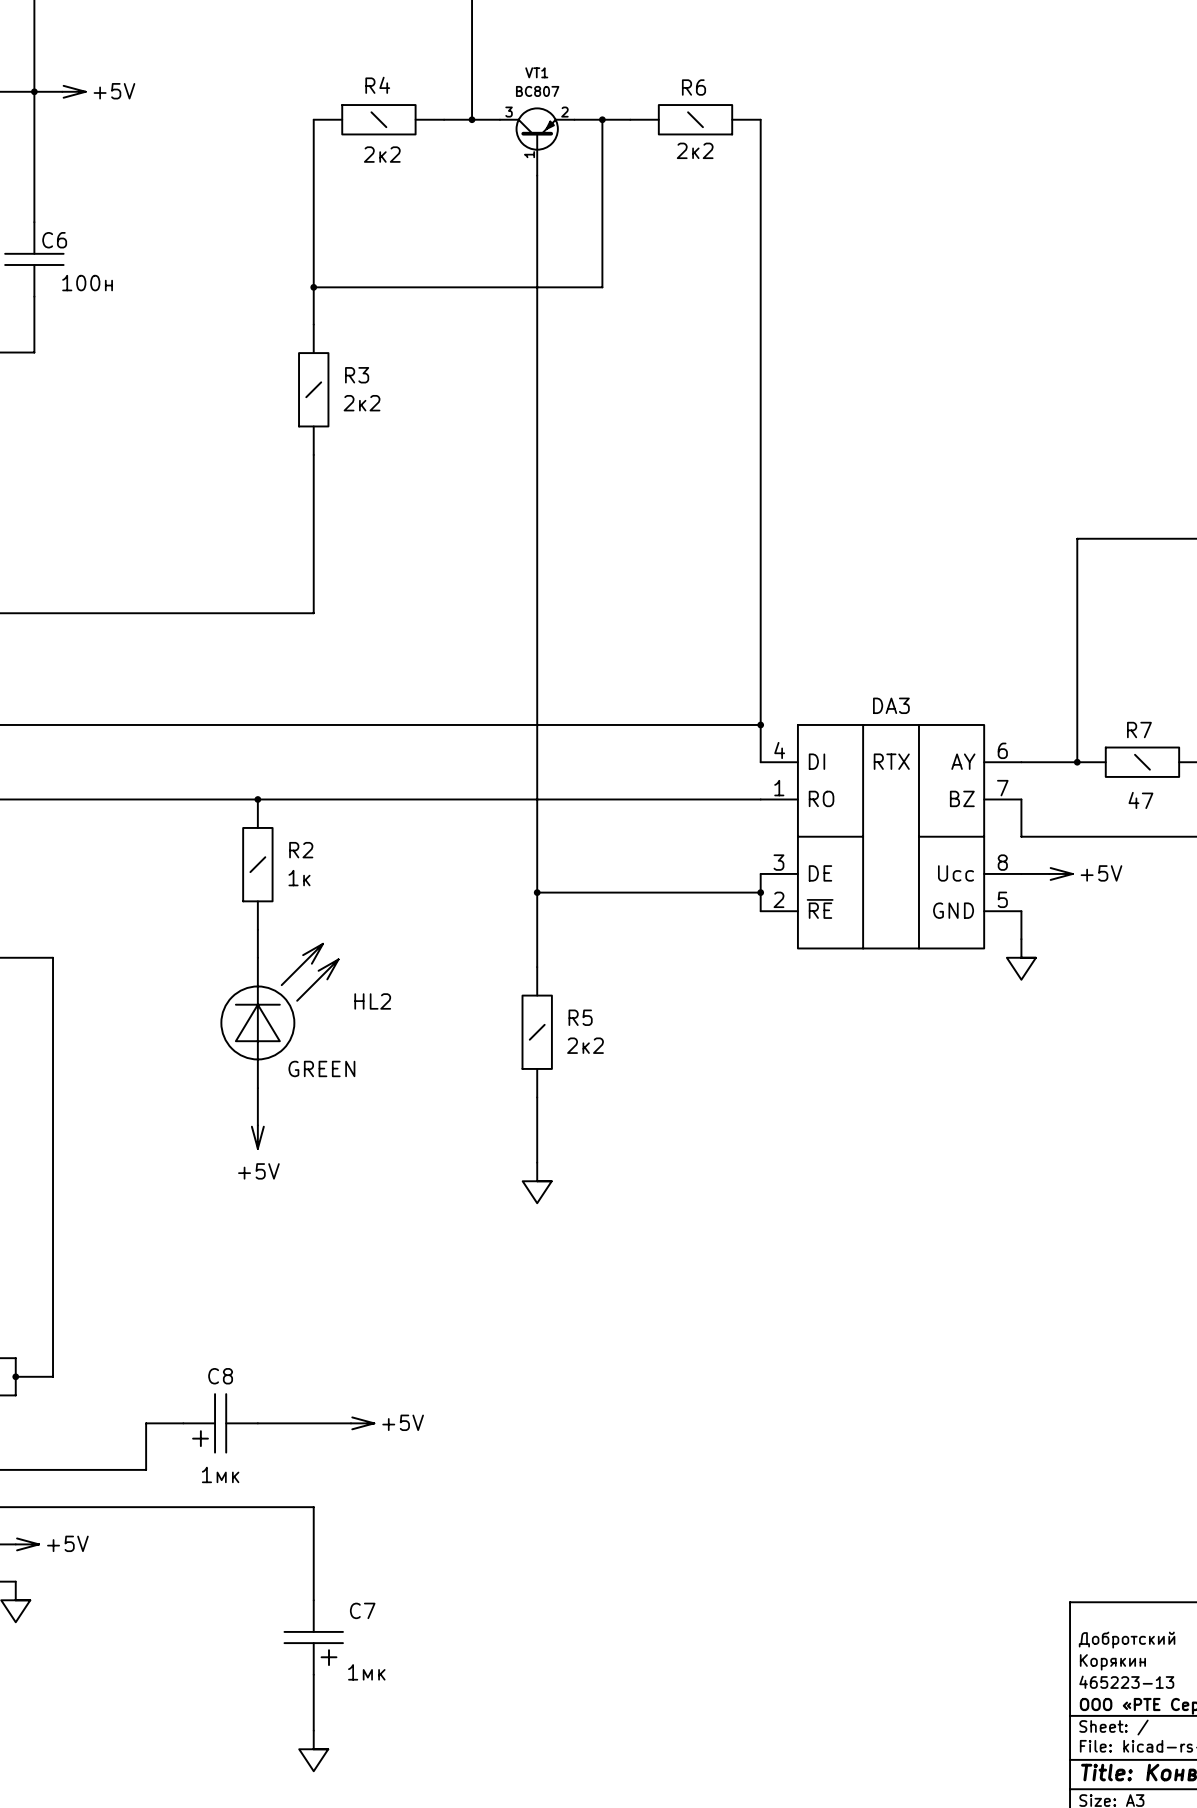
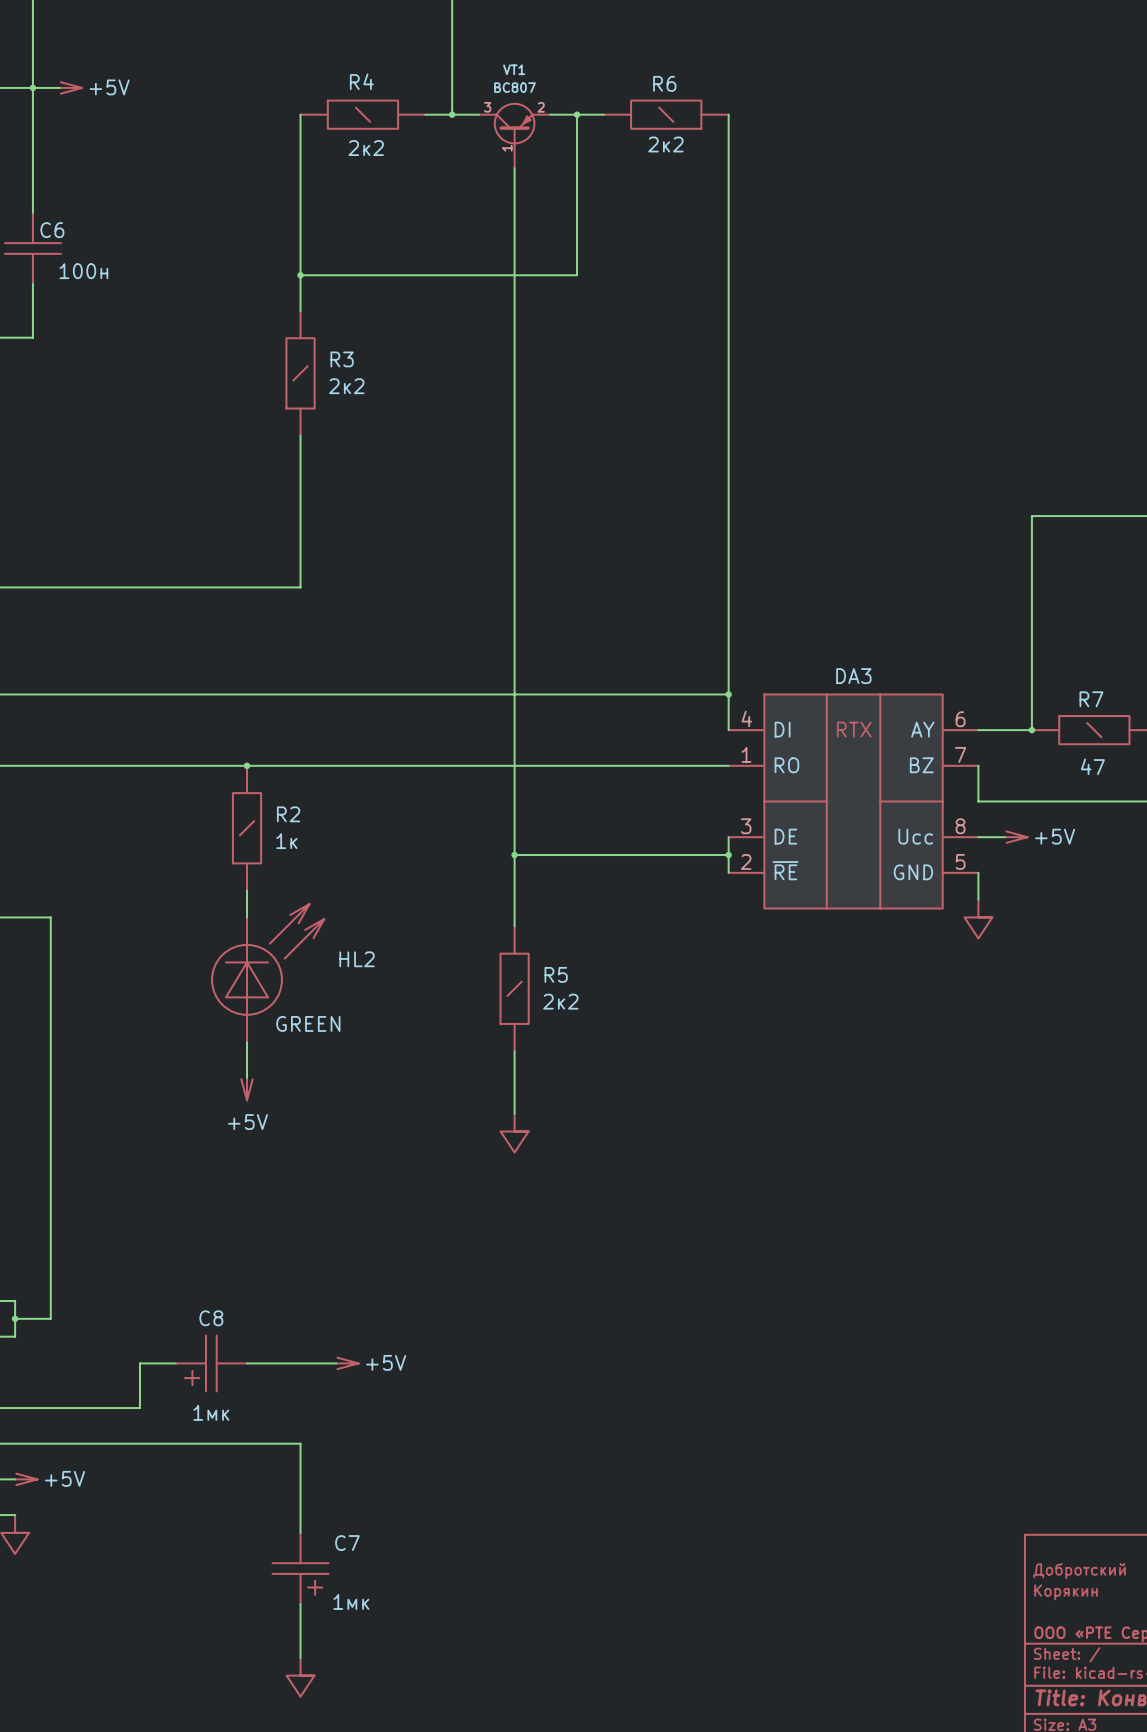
title block: 465223-13 (1126, 1682) -> none

